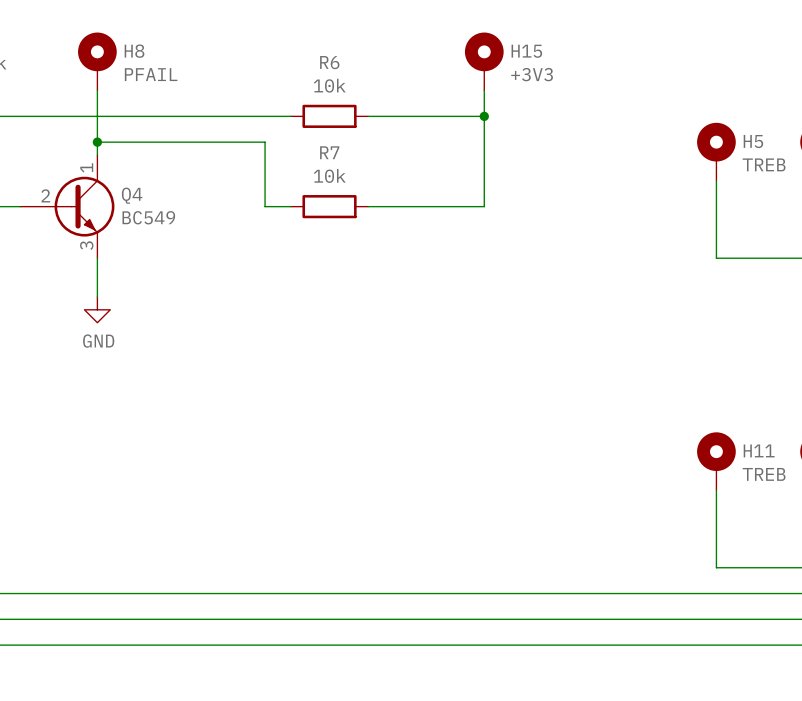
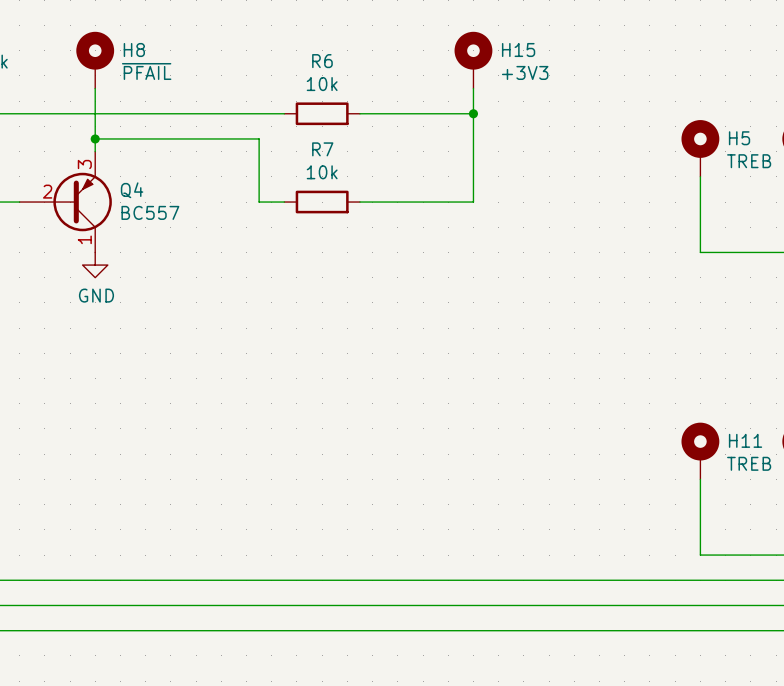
H8 value: PFAIL (151, 74) -> ~{PFAIL} (146, 71)
Q4 symbol: [20, 155, 115, 259] -> [19, 151, 112, 253]
Q4 value: BC549 (148, 217) -> BC557 (150, 212)
wire: (97, 258) (97, 296) -> none
power symbol position: GND (97, 309) -> GND (95, 265)

